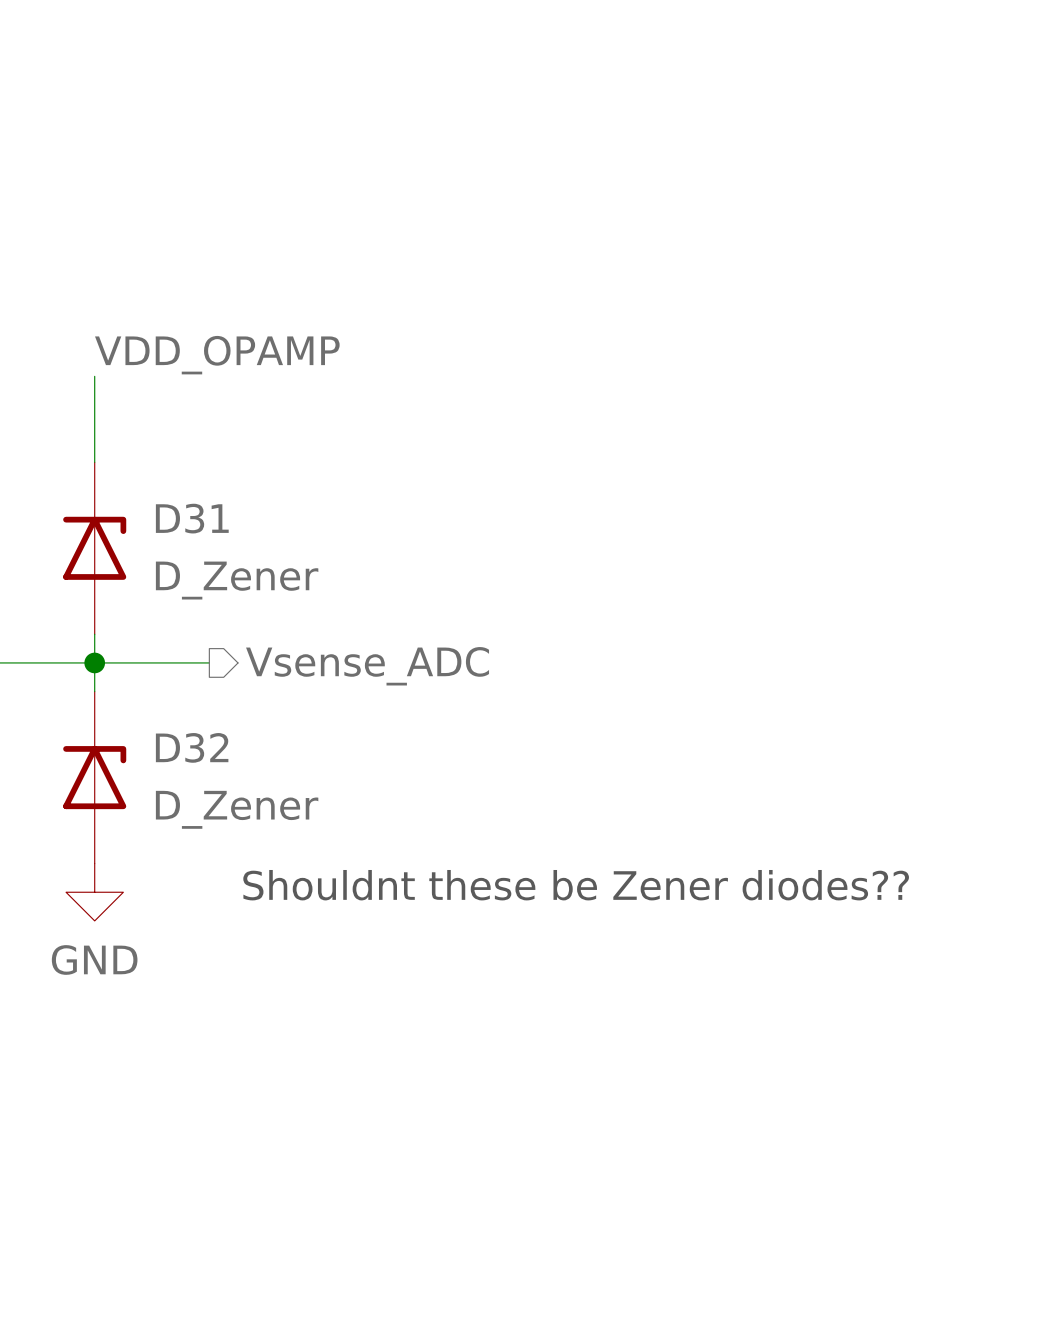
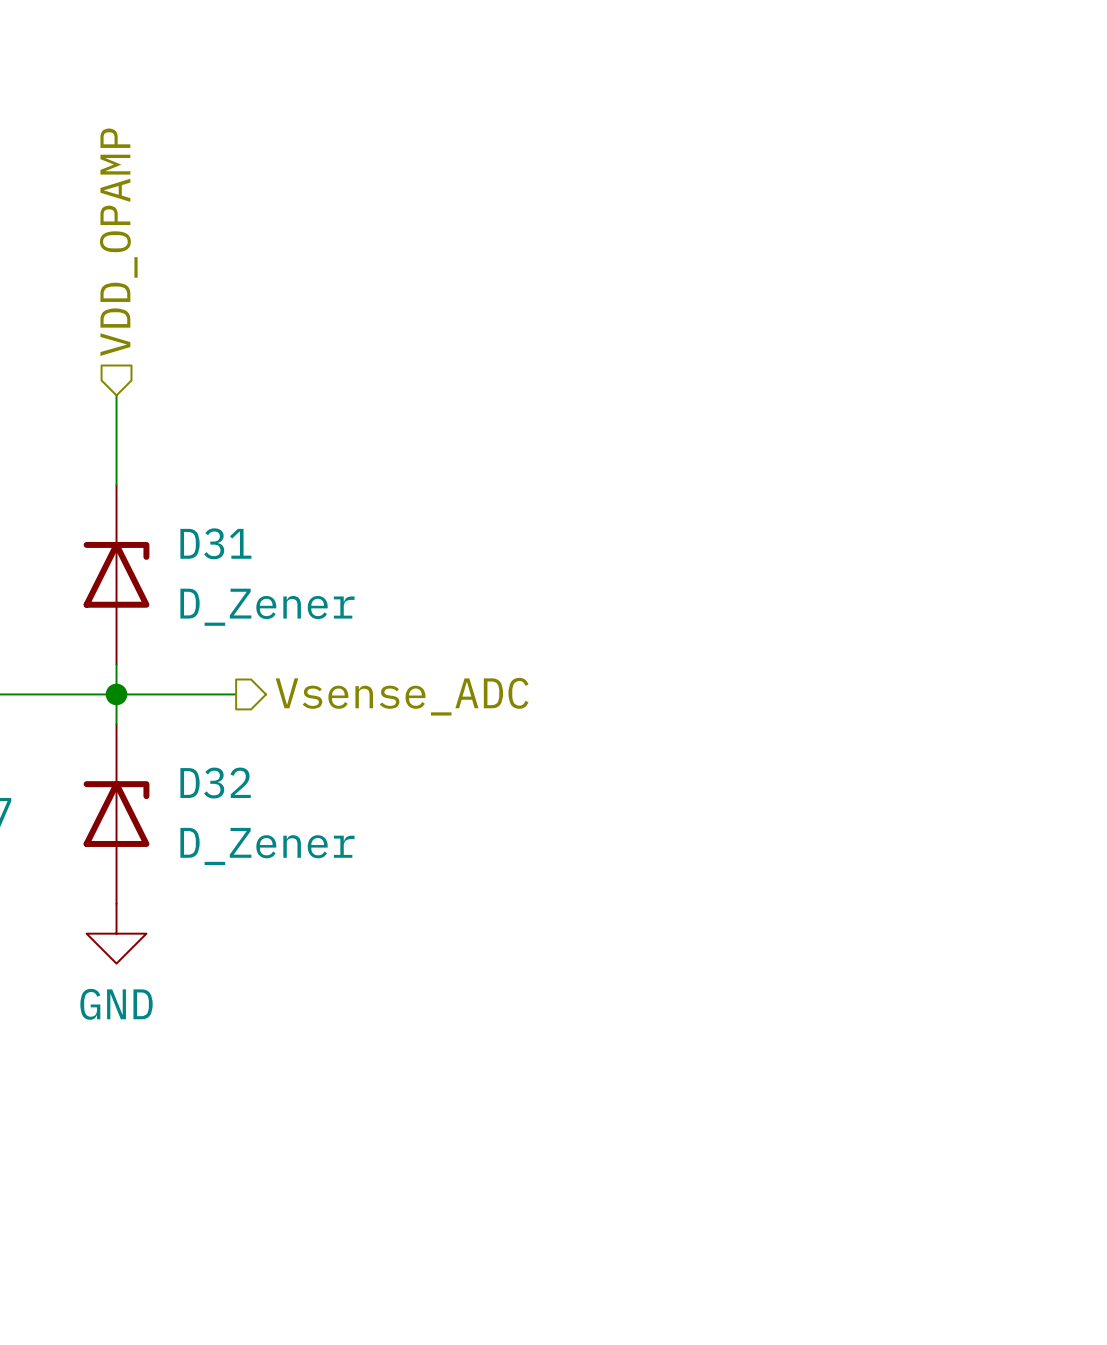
hierarchical label: none -> VDD_OPAMP (118, 242)
label: VDD_OPAMP (217, 355) -> none
text: Shouldnt these be Zener diodes?? (576, 885) -> none

